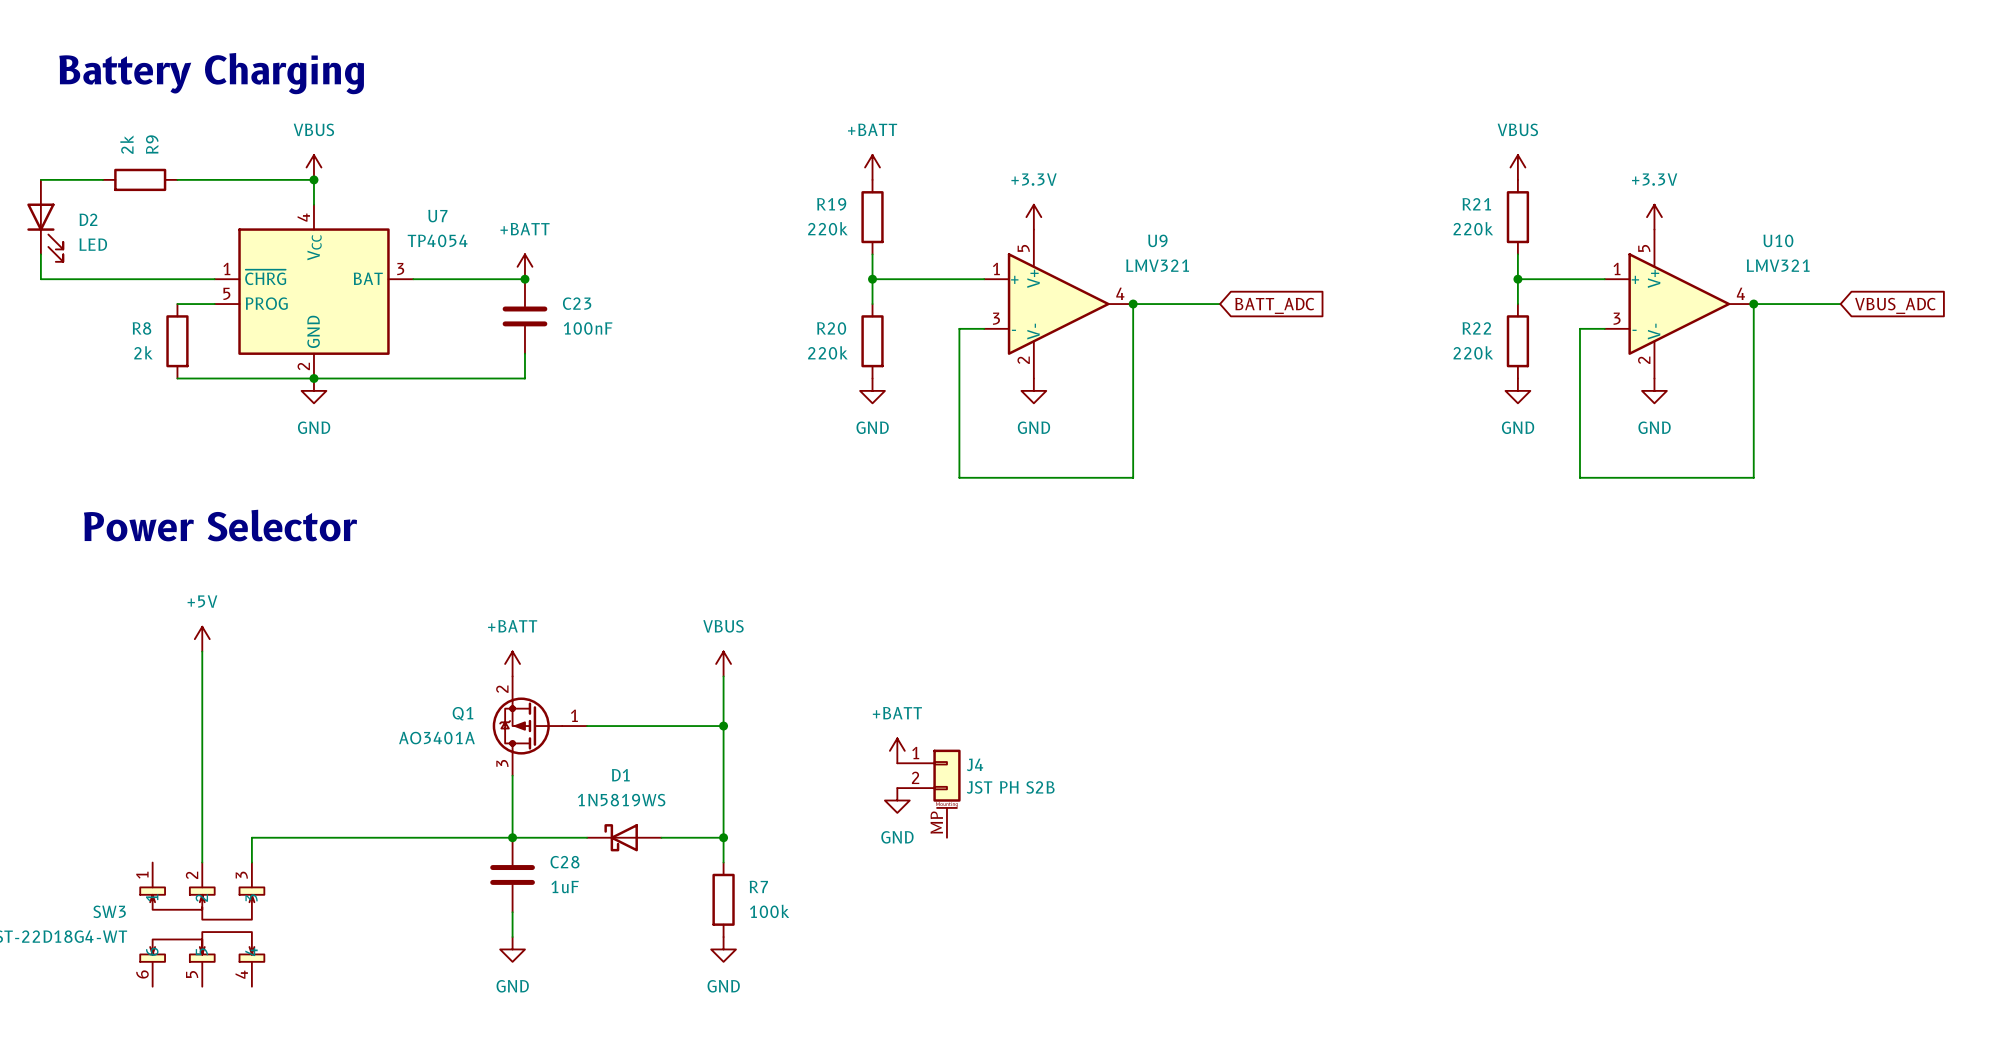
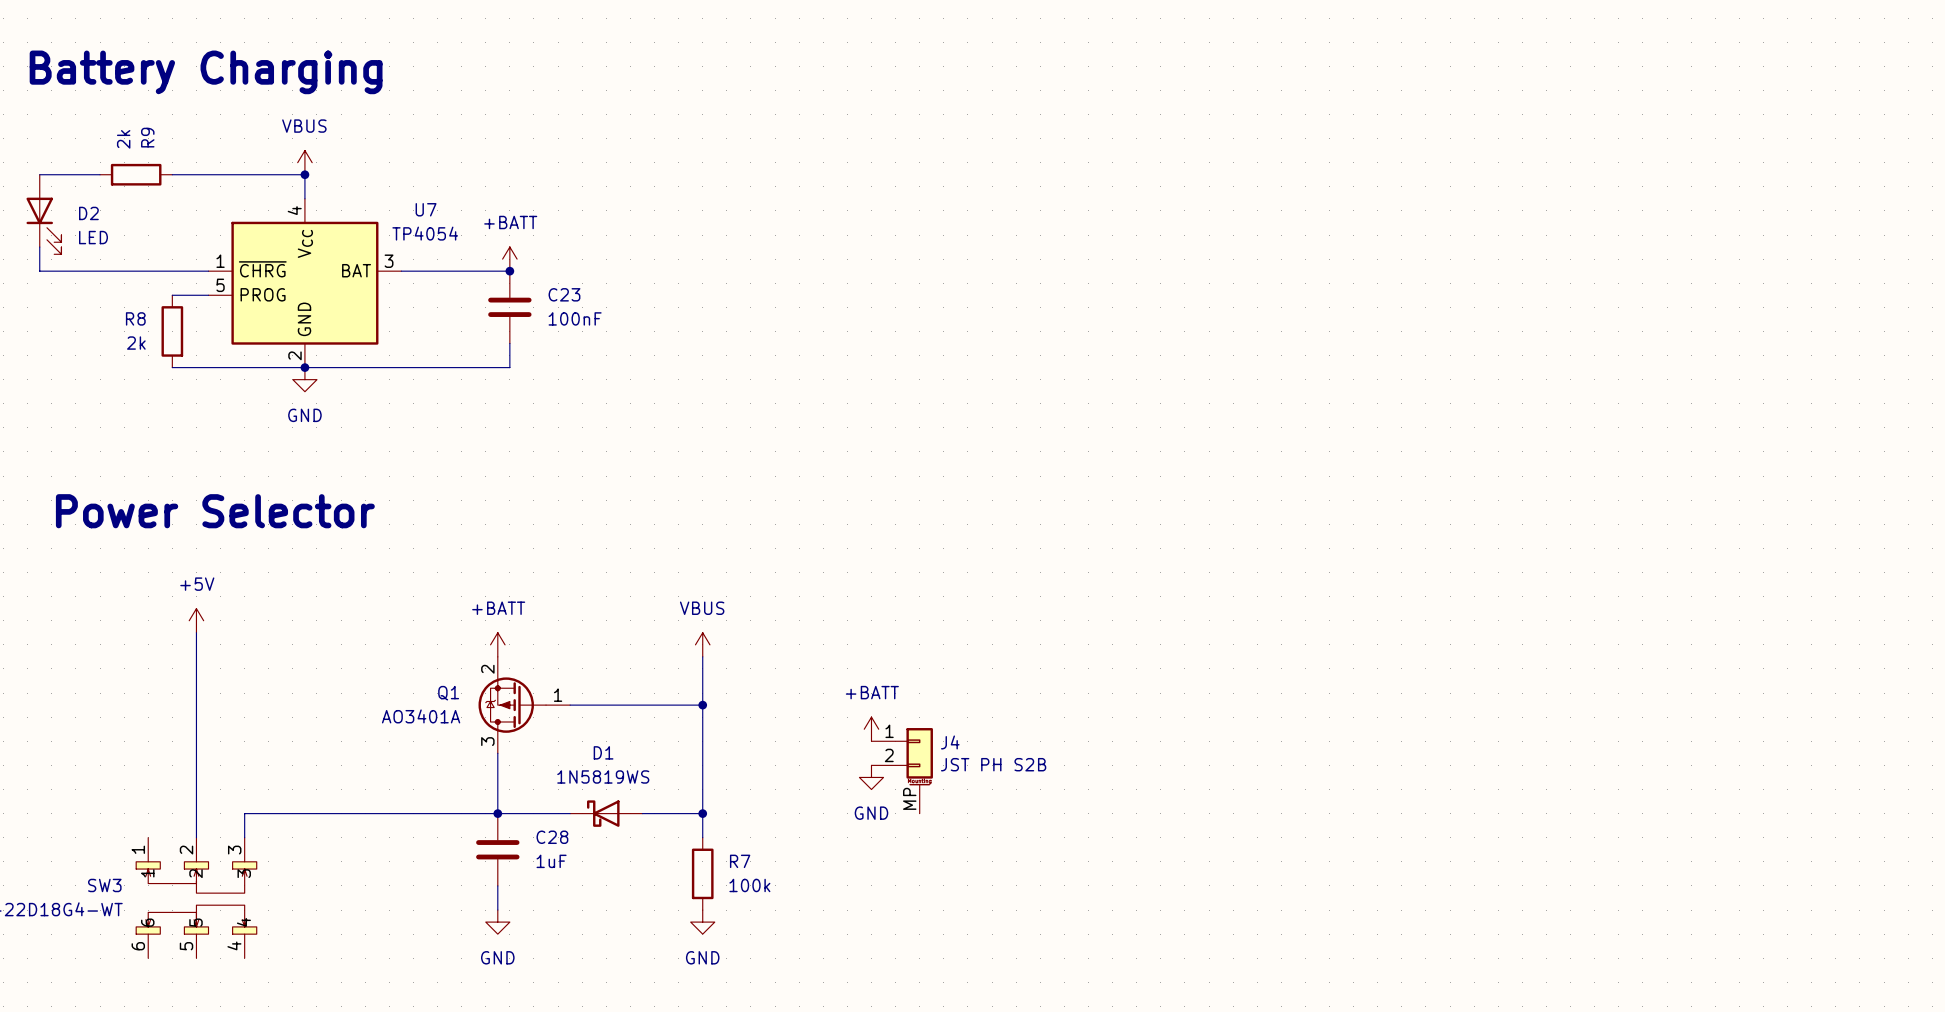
power symbol: +BATT (872, 167) -> none
power symbol: VBUS (1517, 167) -> none
R19: 220k (872, 217) -> none
power symbol: +3.3V (1033, 217) -> none
R21: 220k (1517, 217) -> none
power symbol: +3.3V (1654, 217) -> none
wire: (872, 254) (872, 304) -> none
wire: (1517, 254) (1517, 304) -> none
wire: (872, 279) (984, 279) -> none
junction: (872, 279) -> none
wire: (1517, 279) (1604, 279) -> none
junction: (1517, 279) -> none
U9: LMV321 (1058, 304) -> none
junction: (1133, 304) -> none
wire: (1220, 304) (1133, 304) (1133, 477) (959, 477) (959, 328) (984, 328) -> none
U10: LMV321 (1679, 304) -> none
junction: (1753, 304) -> none
wire: (1840, 304) (1753, 304) (1753, 477) (1579, 477) (1579, 328) (1604, 328) -> none
global label: BATT_ADC (1274, 305) -> none
global label: VBUS_ADC (1895, 305) -> none
R20: 220k (872, 341) -> none
R22: 220k (1517, 341) -> none
power symbol: GND (872, 390) -> none
power symbol: GND (1033, 390) -> none
power symbol: GND (1517, 390) -> none
power symbol: GND (1654, 390) -> none

